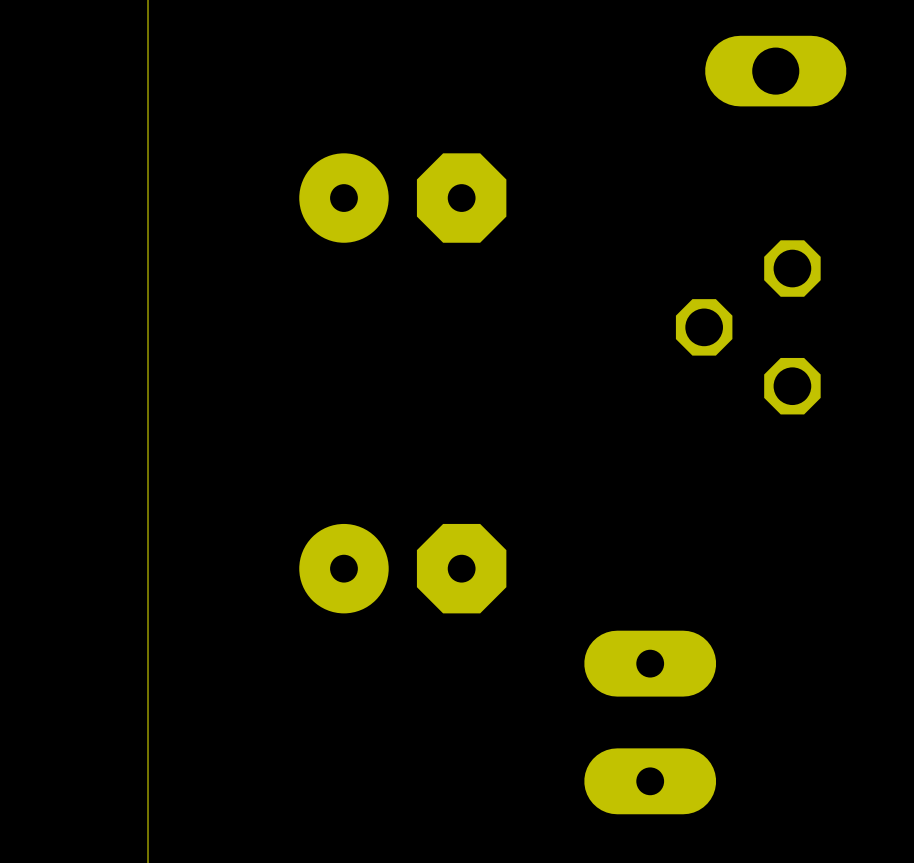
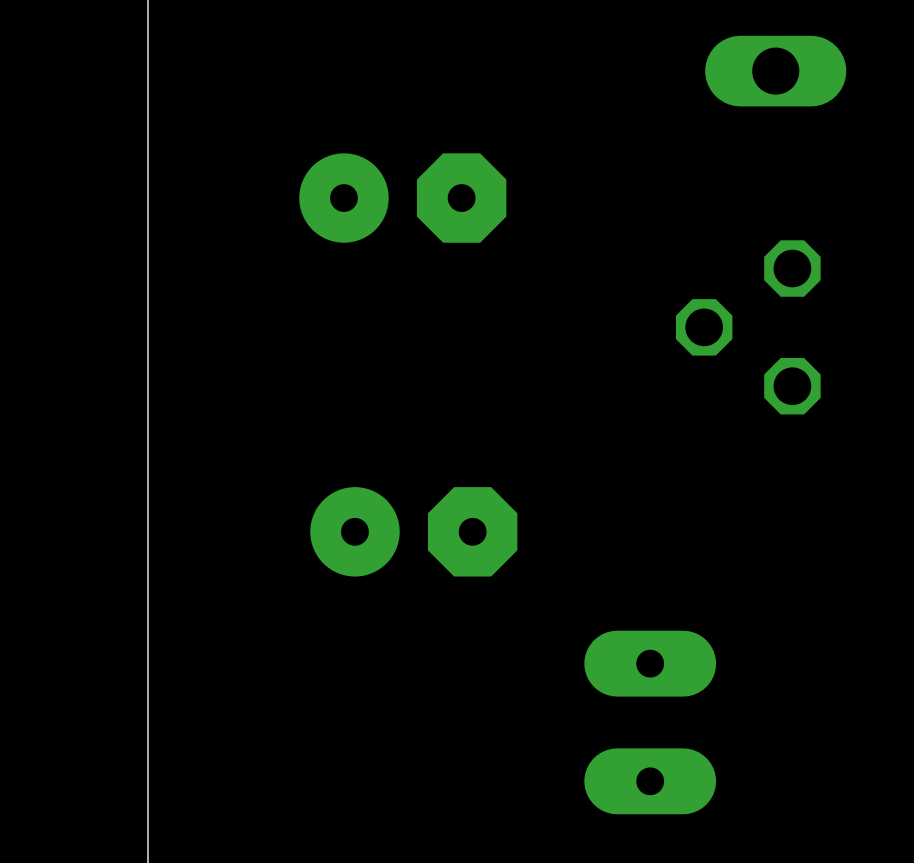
part position: (402, 568) -> (413, 531)

